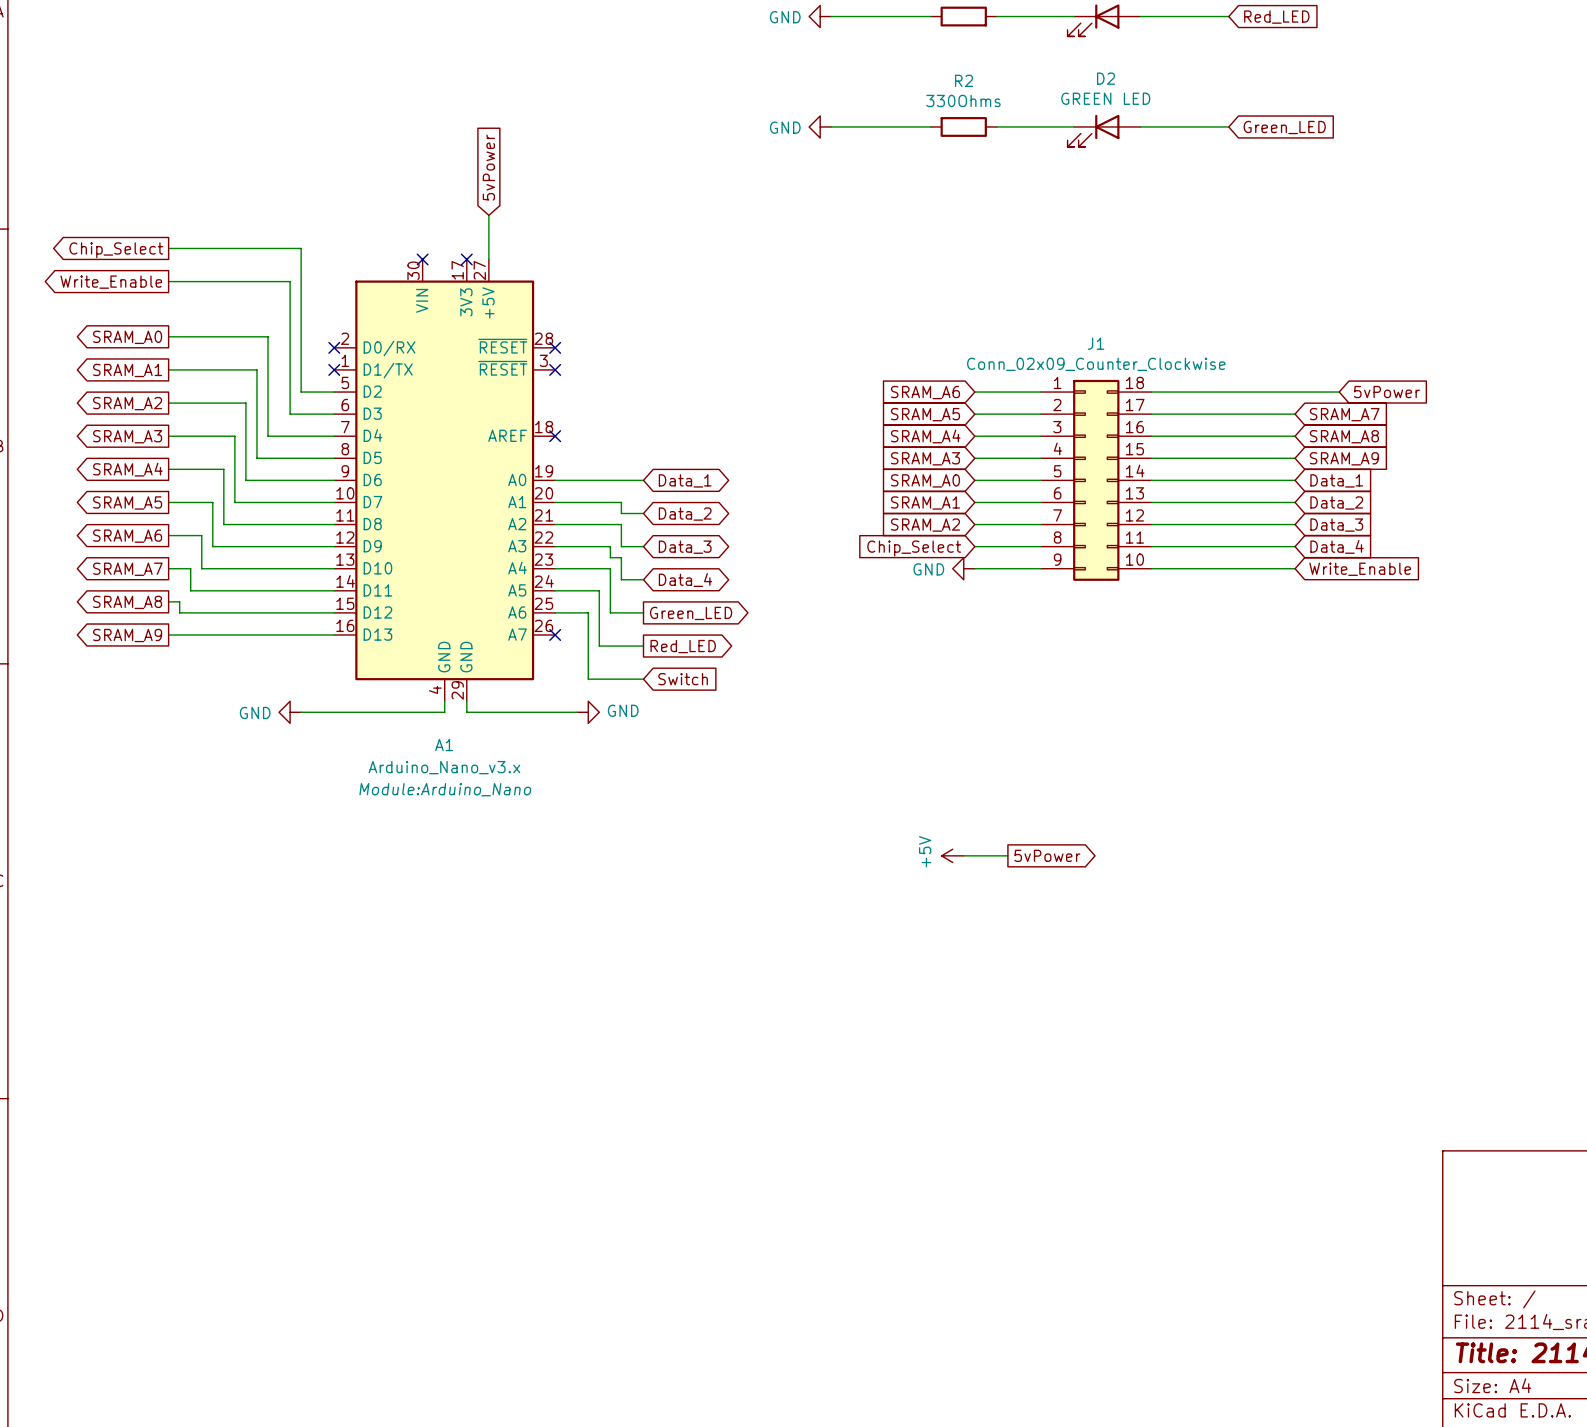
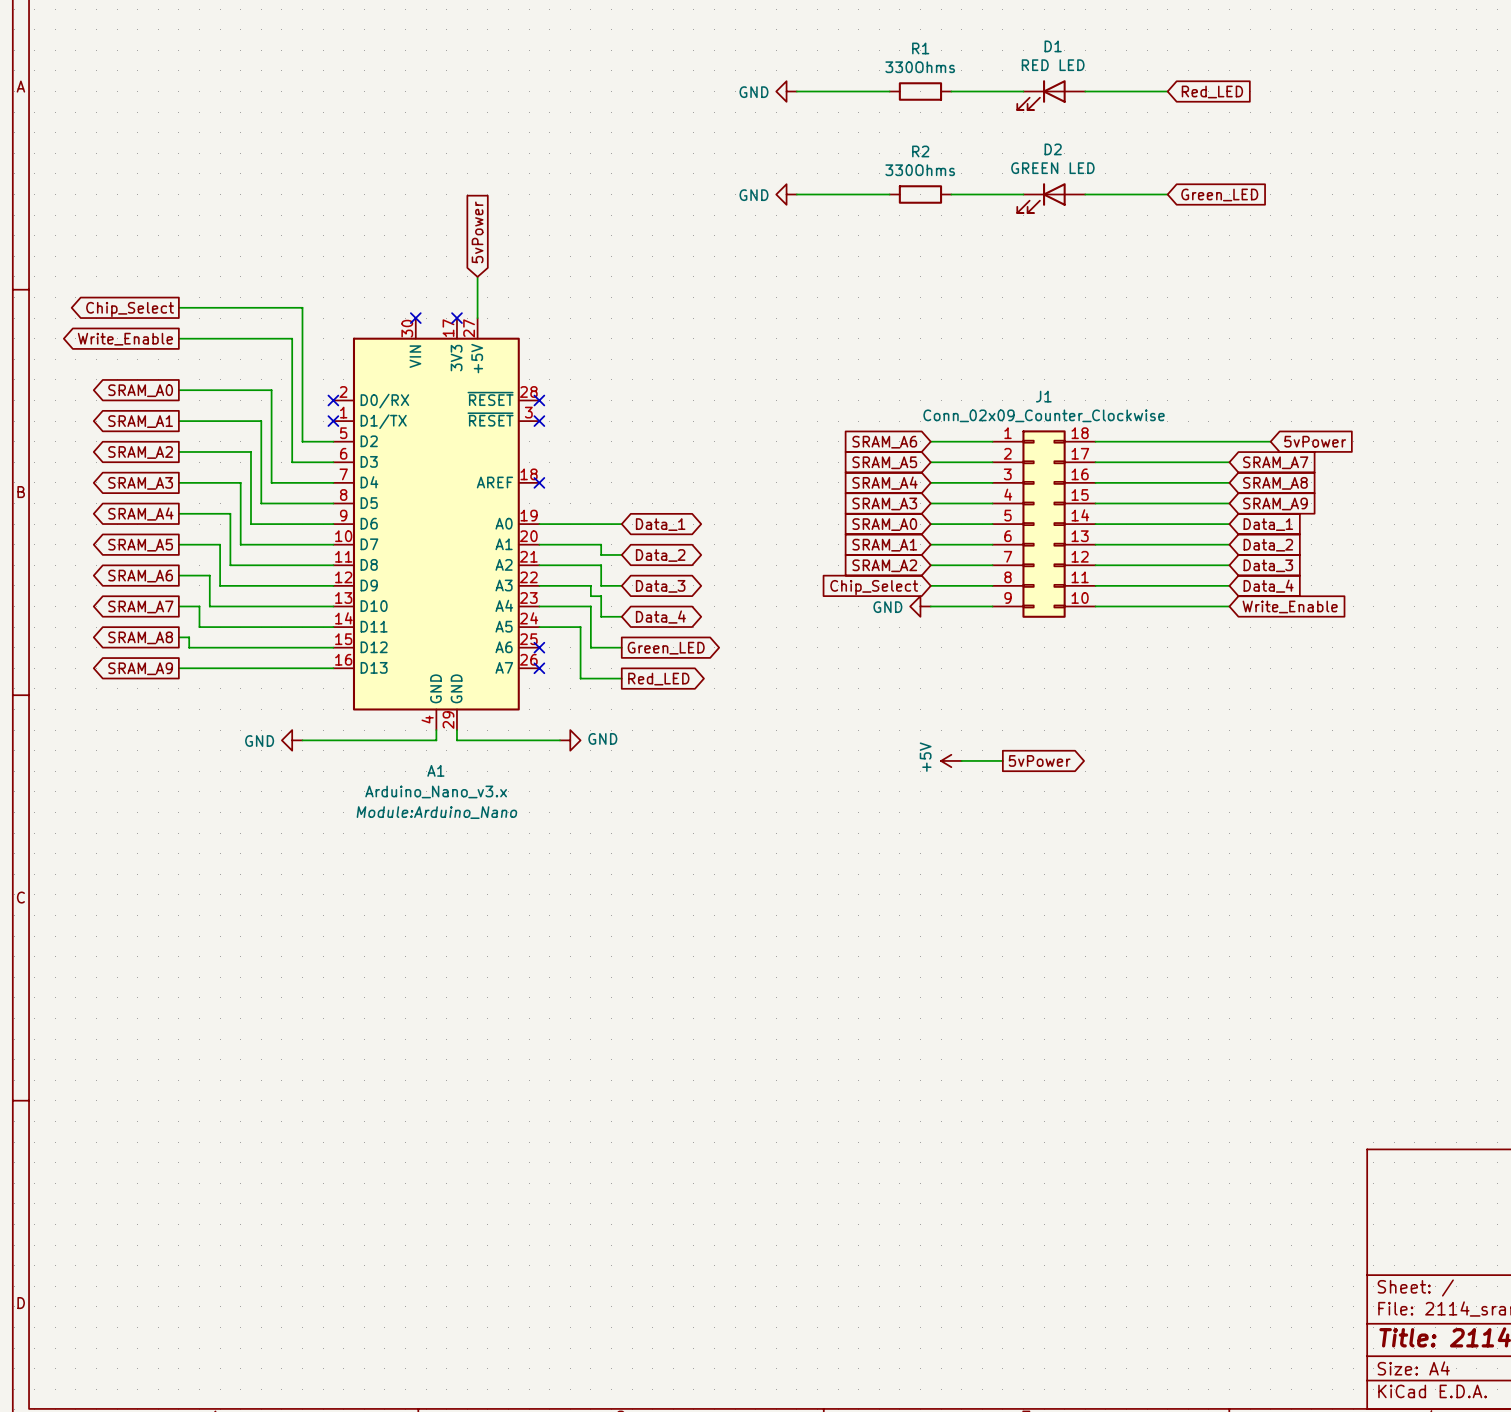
wire: (555, 612) (588, 612) (588, 679) (643, 679) -> none
no-connect mark: none -> (539, 647)
global label: Switch (683, 679) -> none
power symbol position: +5V (952, 855) -> +5V (951, 760)
wire: (963, 855) (1007, 855) -> (961, 760) (1002, 760)
global label position: 5vPower (1047, 855) -> 5vPower (1039, 760)

